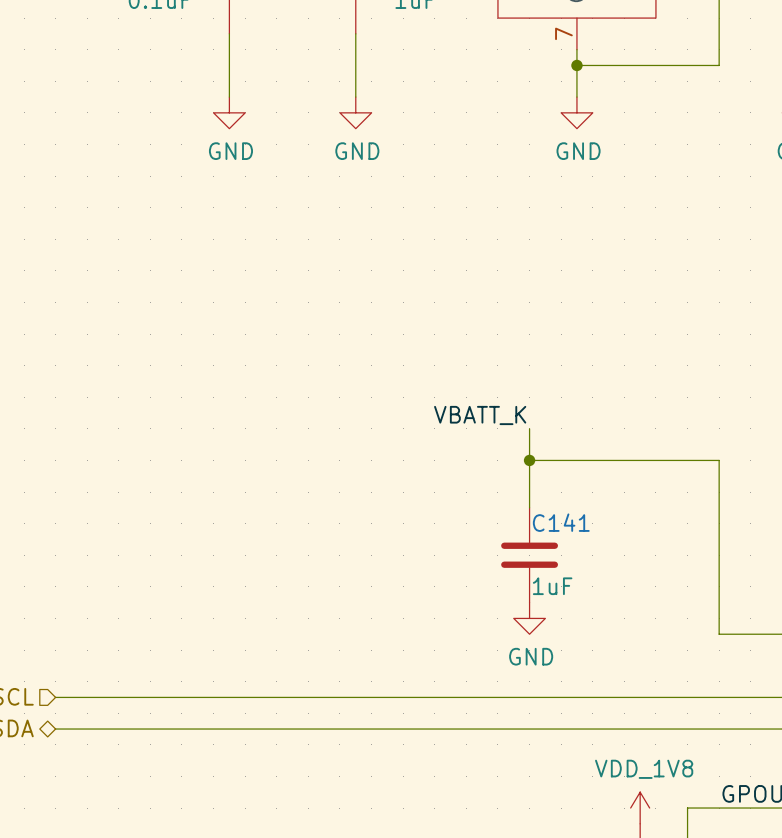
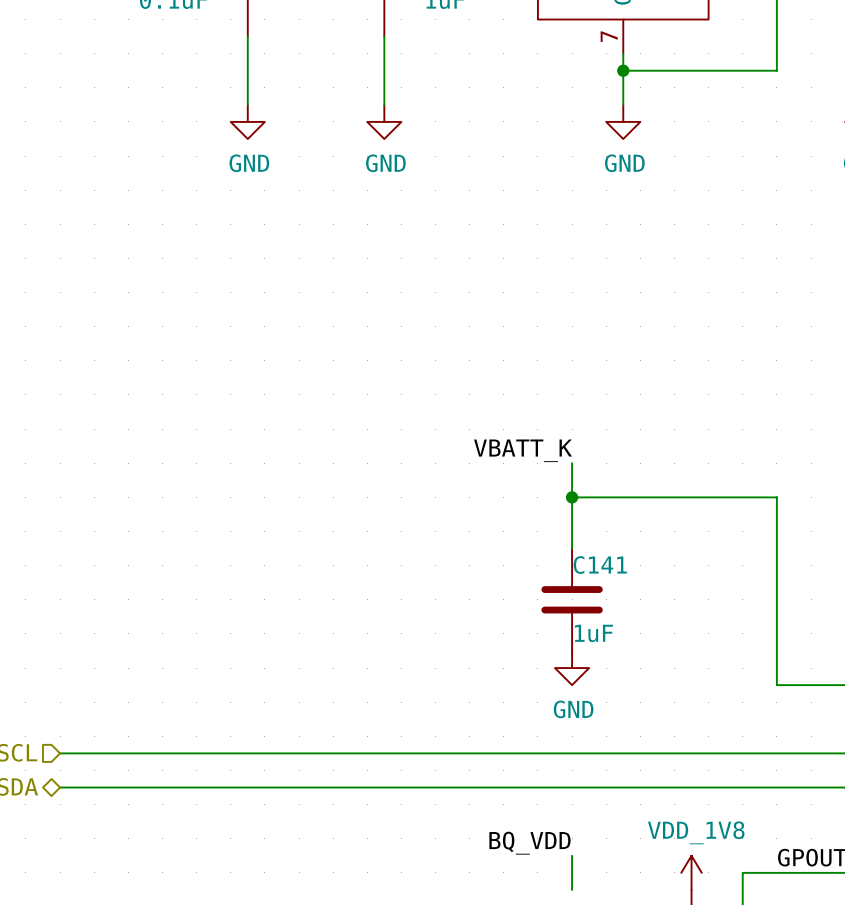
label: none -> BQ_VDD (530, 843)
wire: none -> (572, 855) (572, 889)

